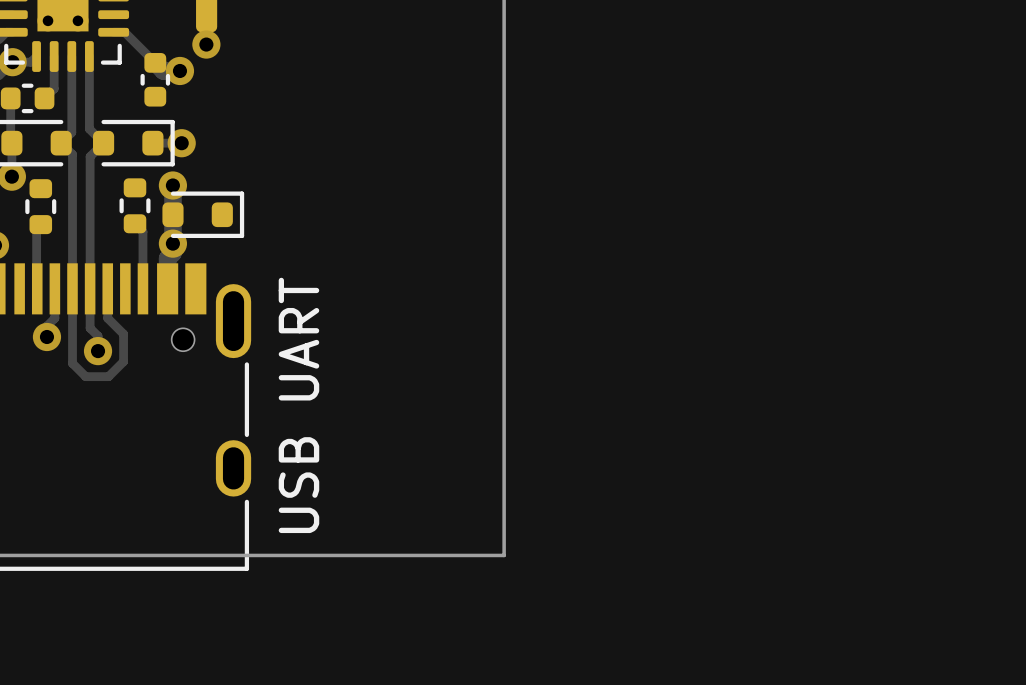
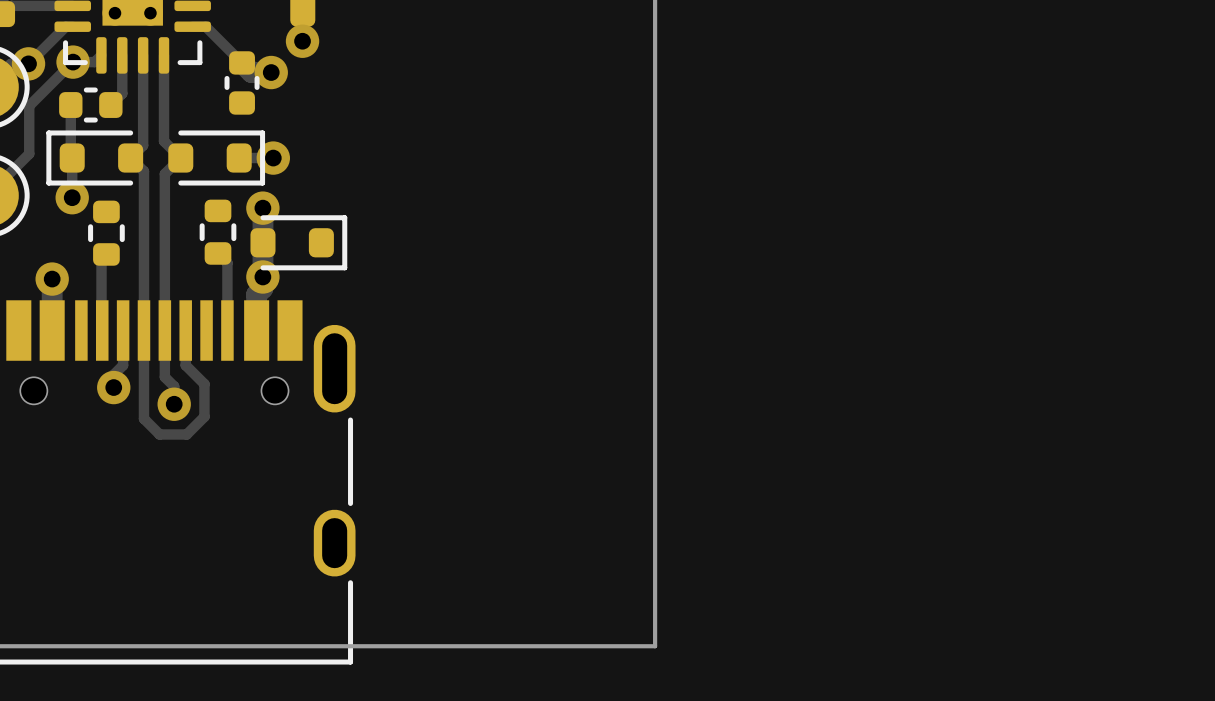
text: USB UART (298, 405) -> none

